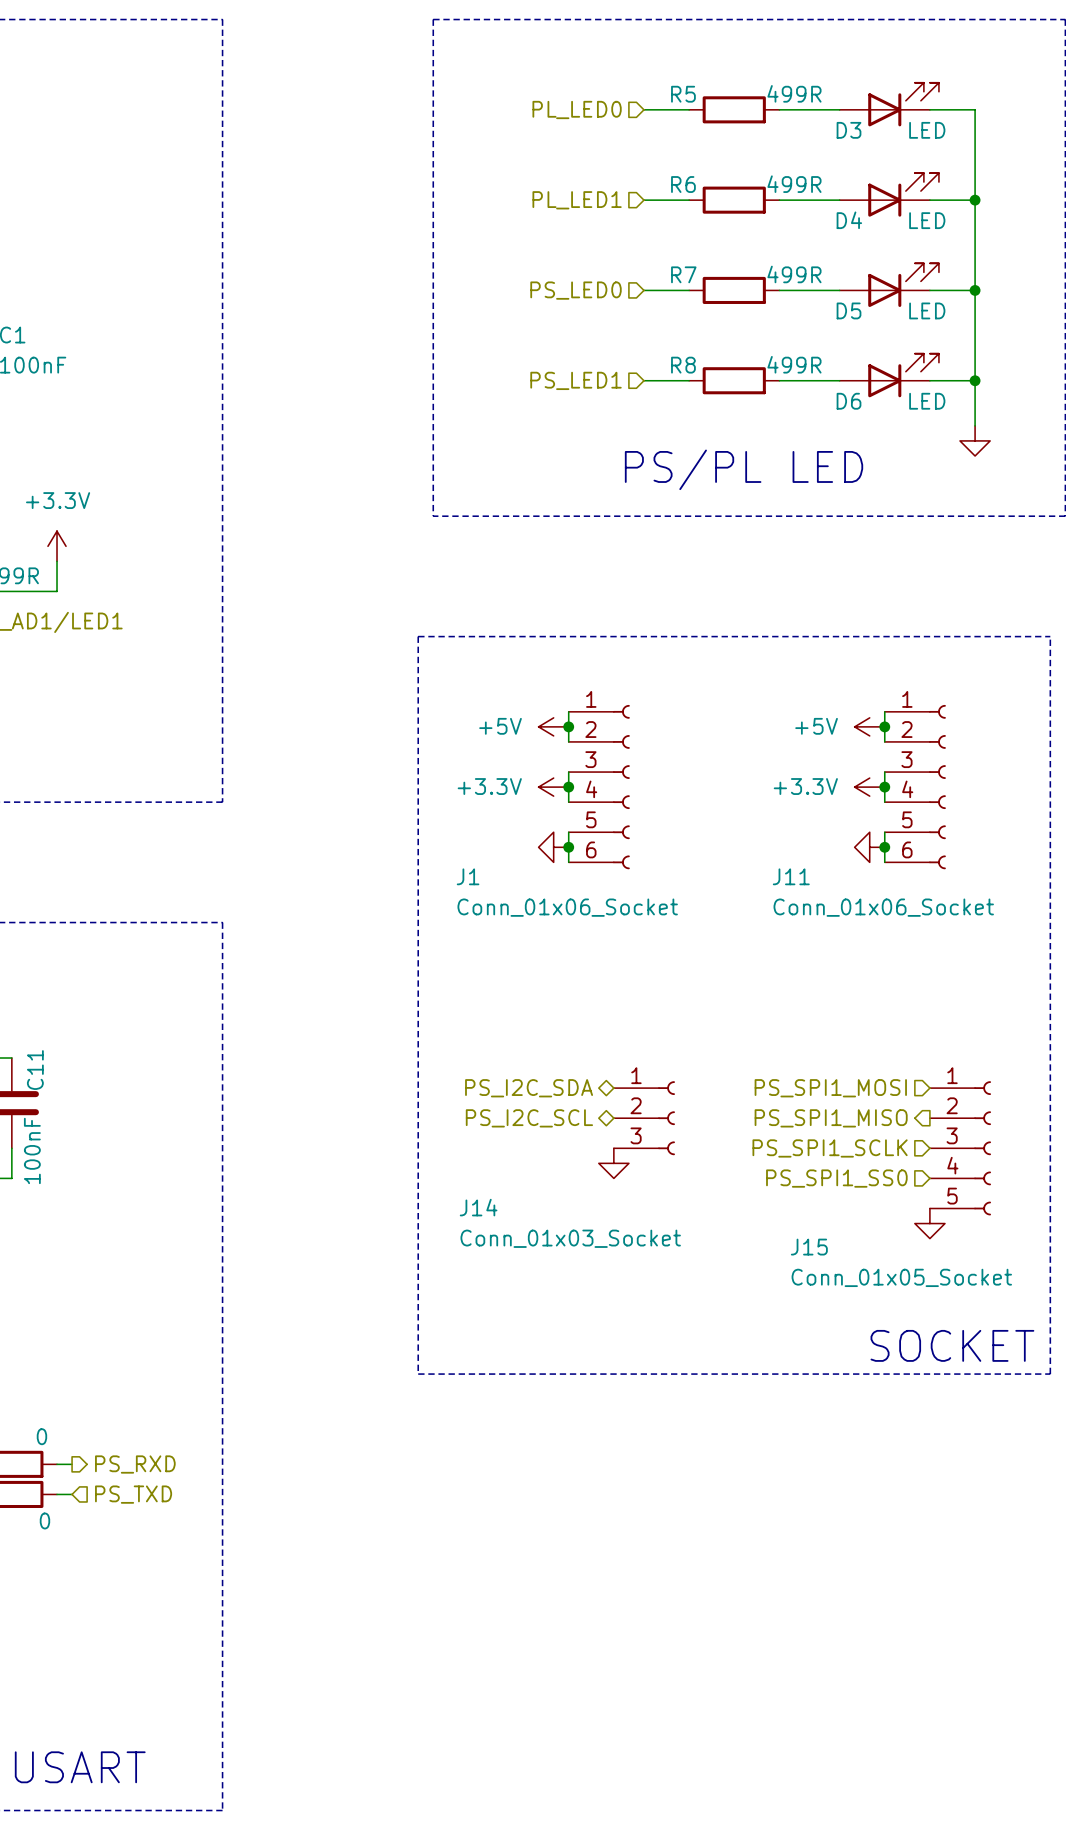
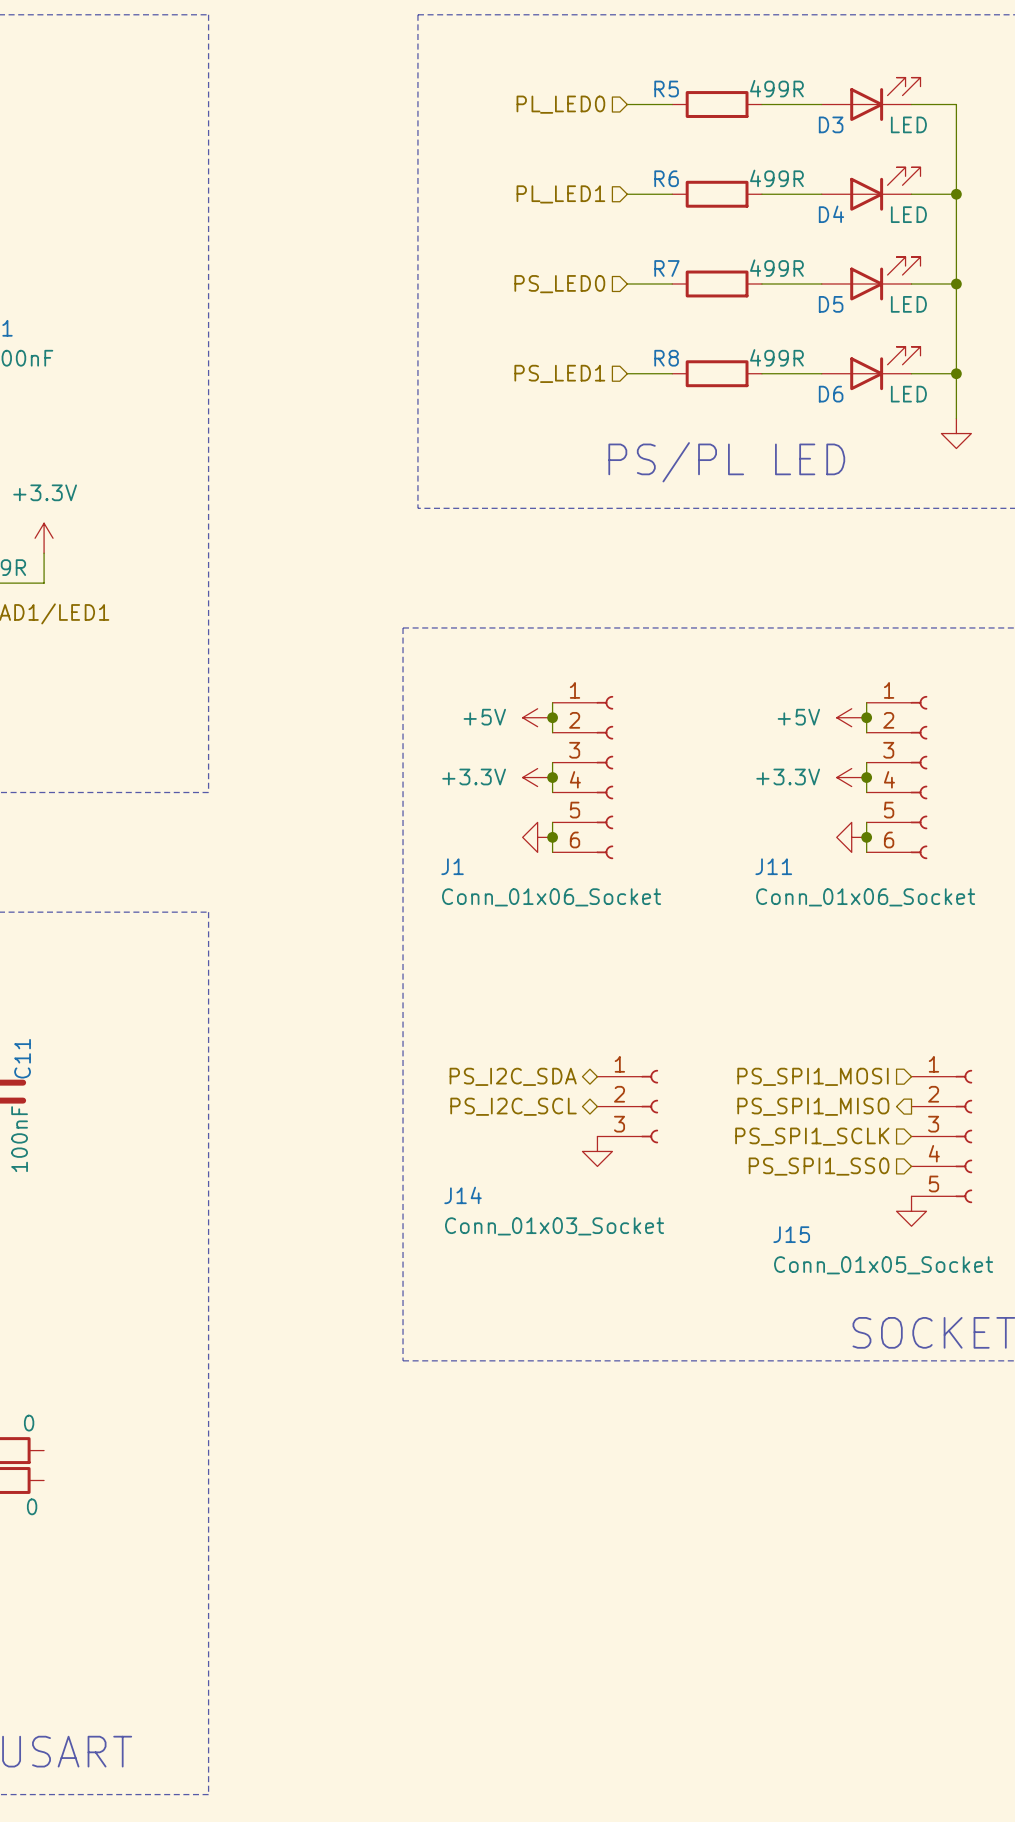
wire: (57, 1464) (72, 1464) -> none
hierarchical label: PS_RXD (135, 1464) -> none
wire: (57, 1494) (72, 1494) -> none
hierarchical label: PS_TXD (133, 1494) -> none

